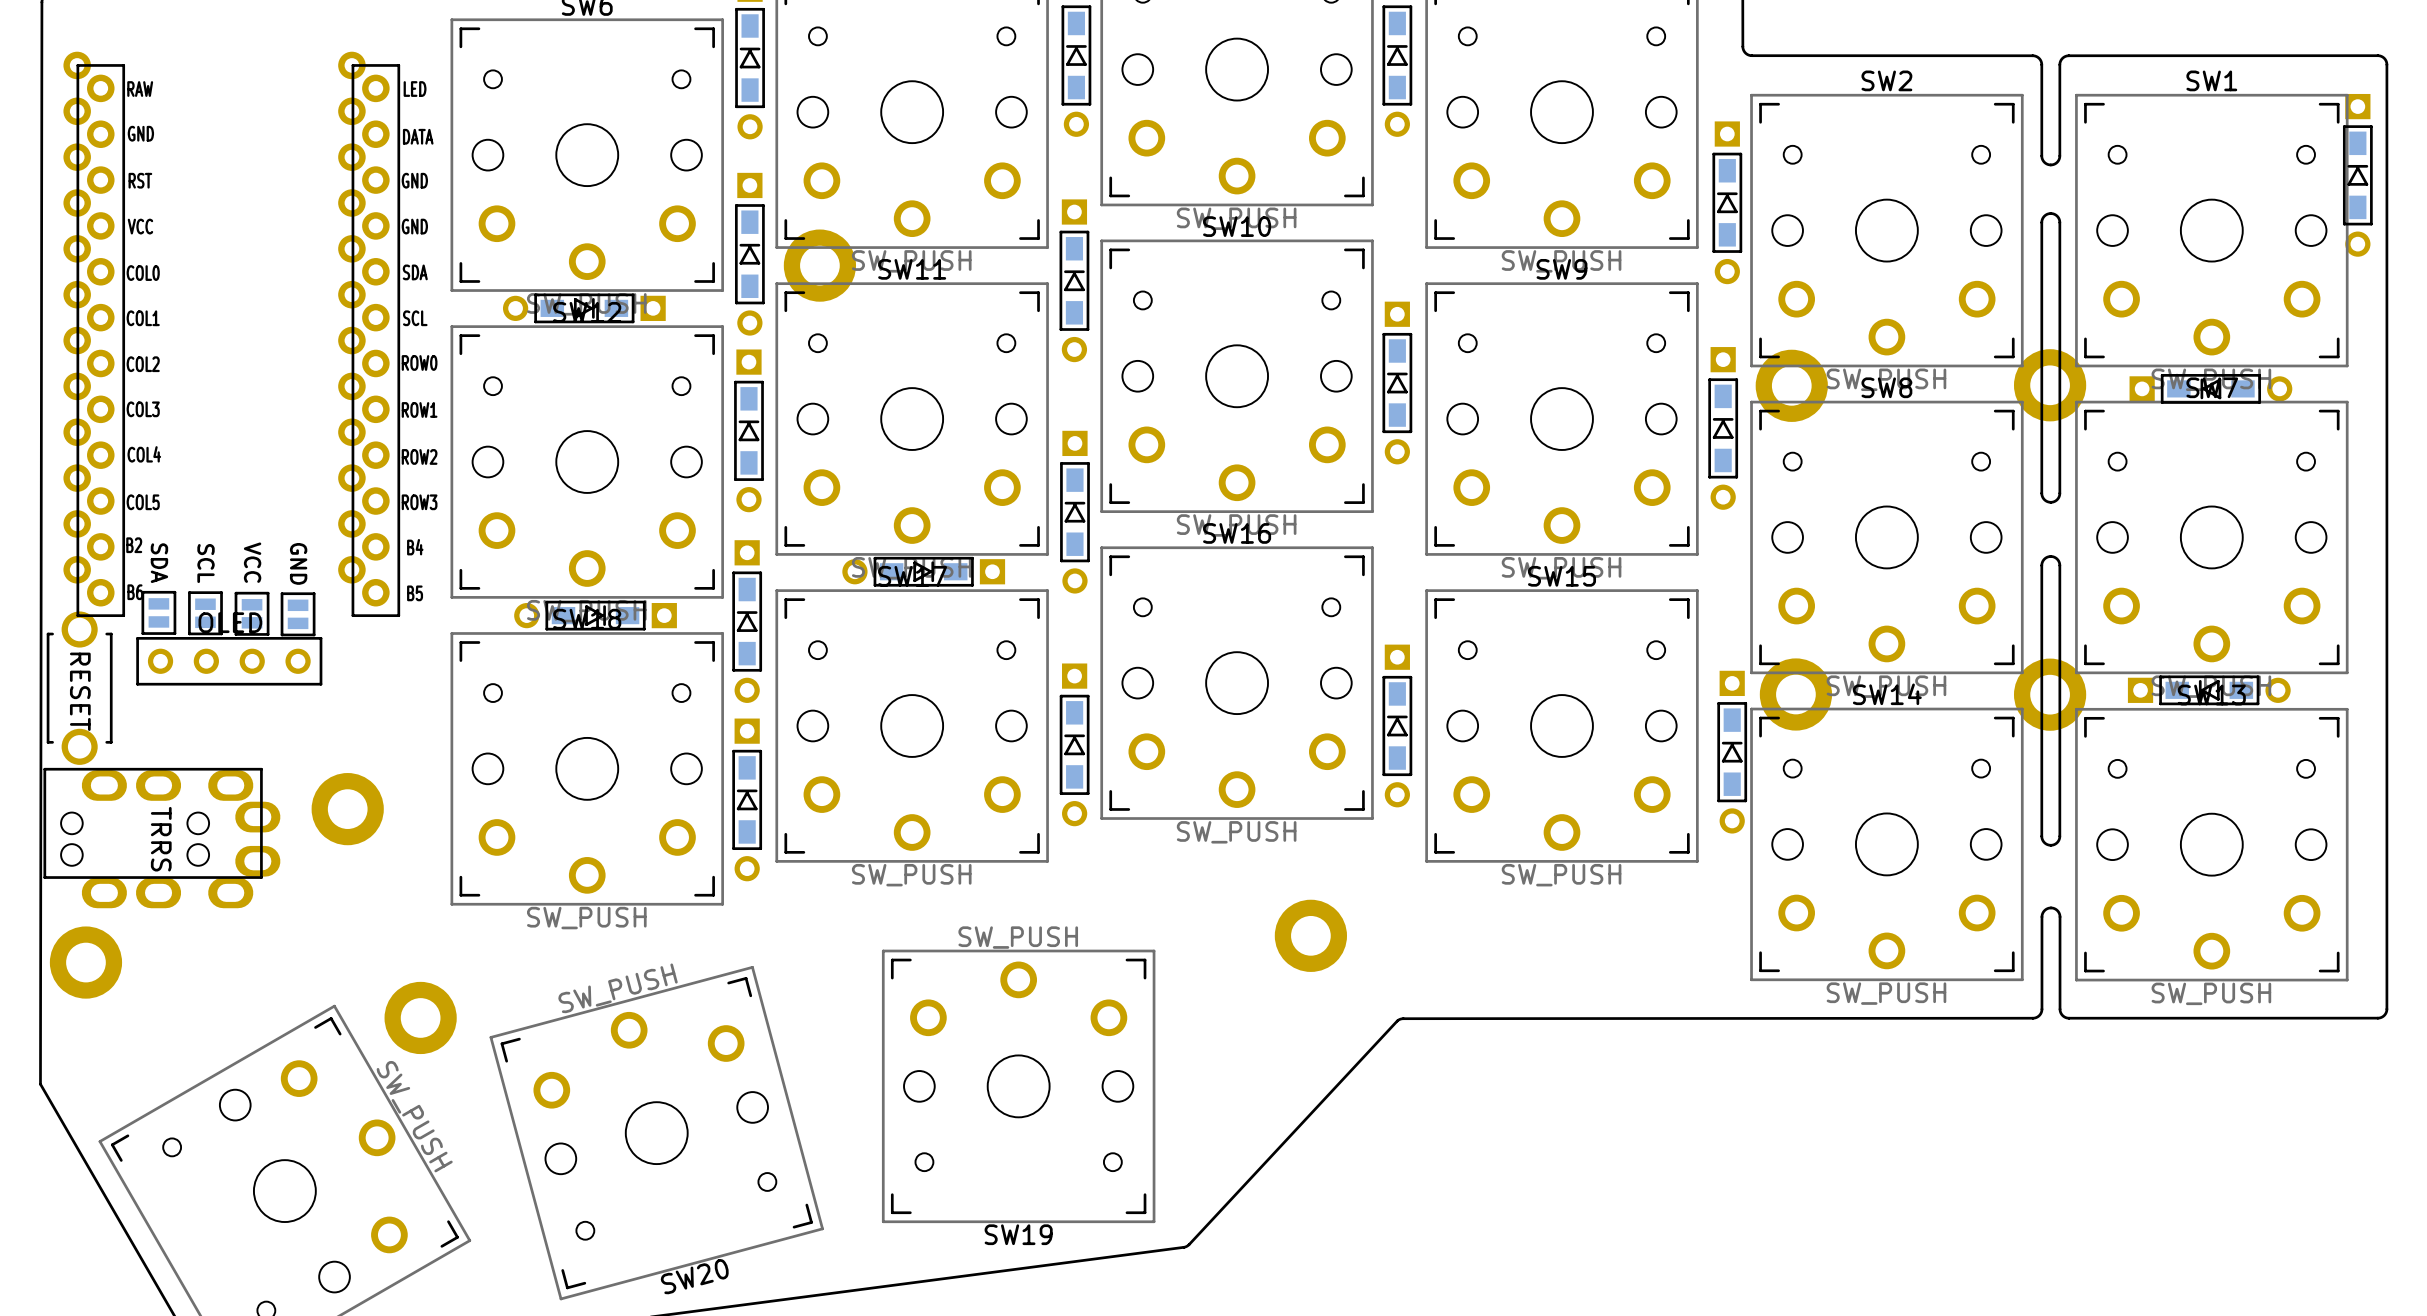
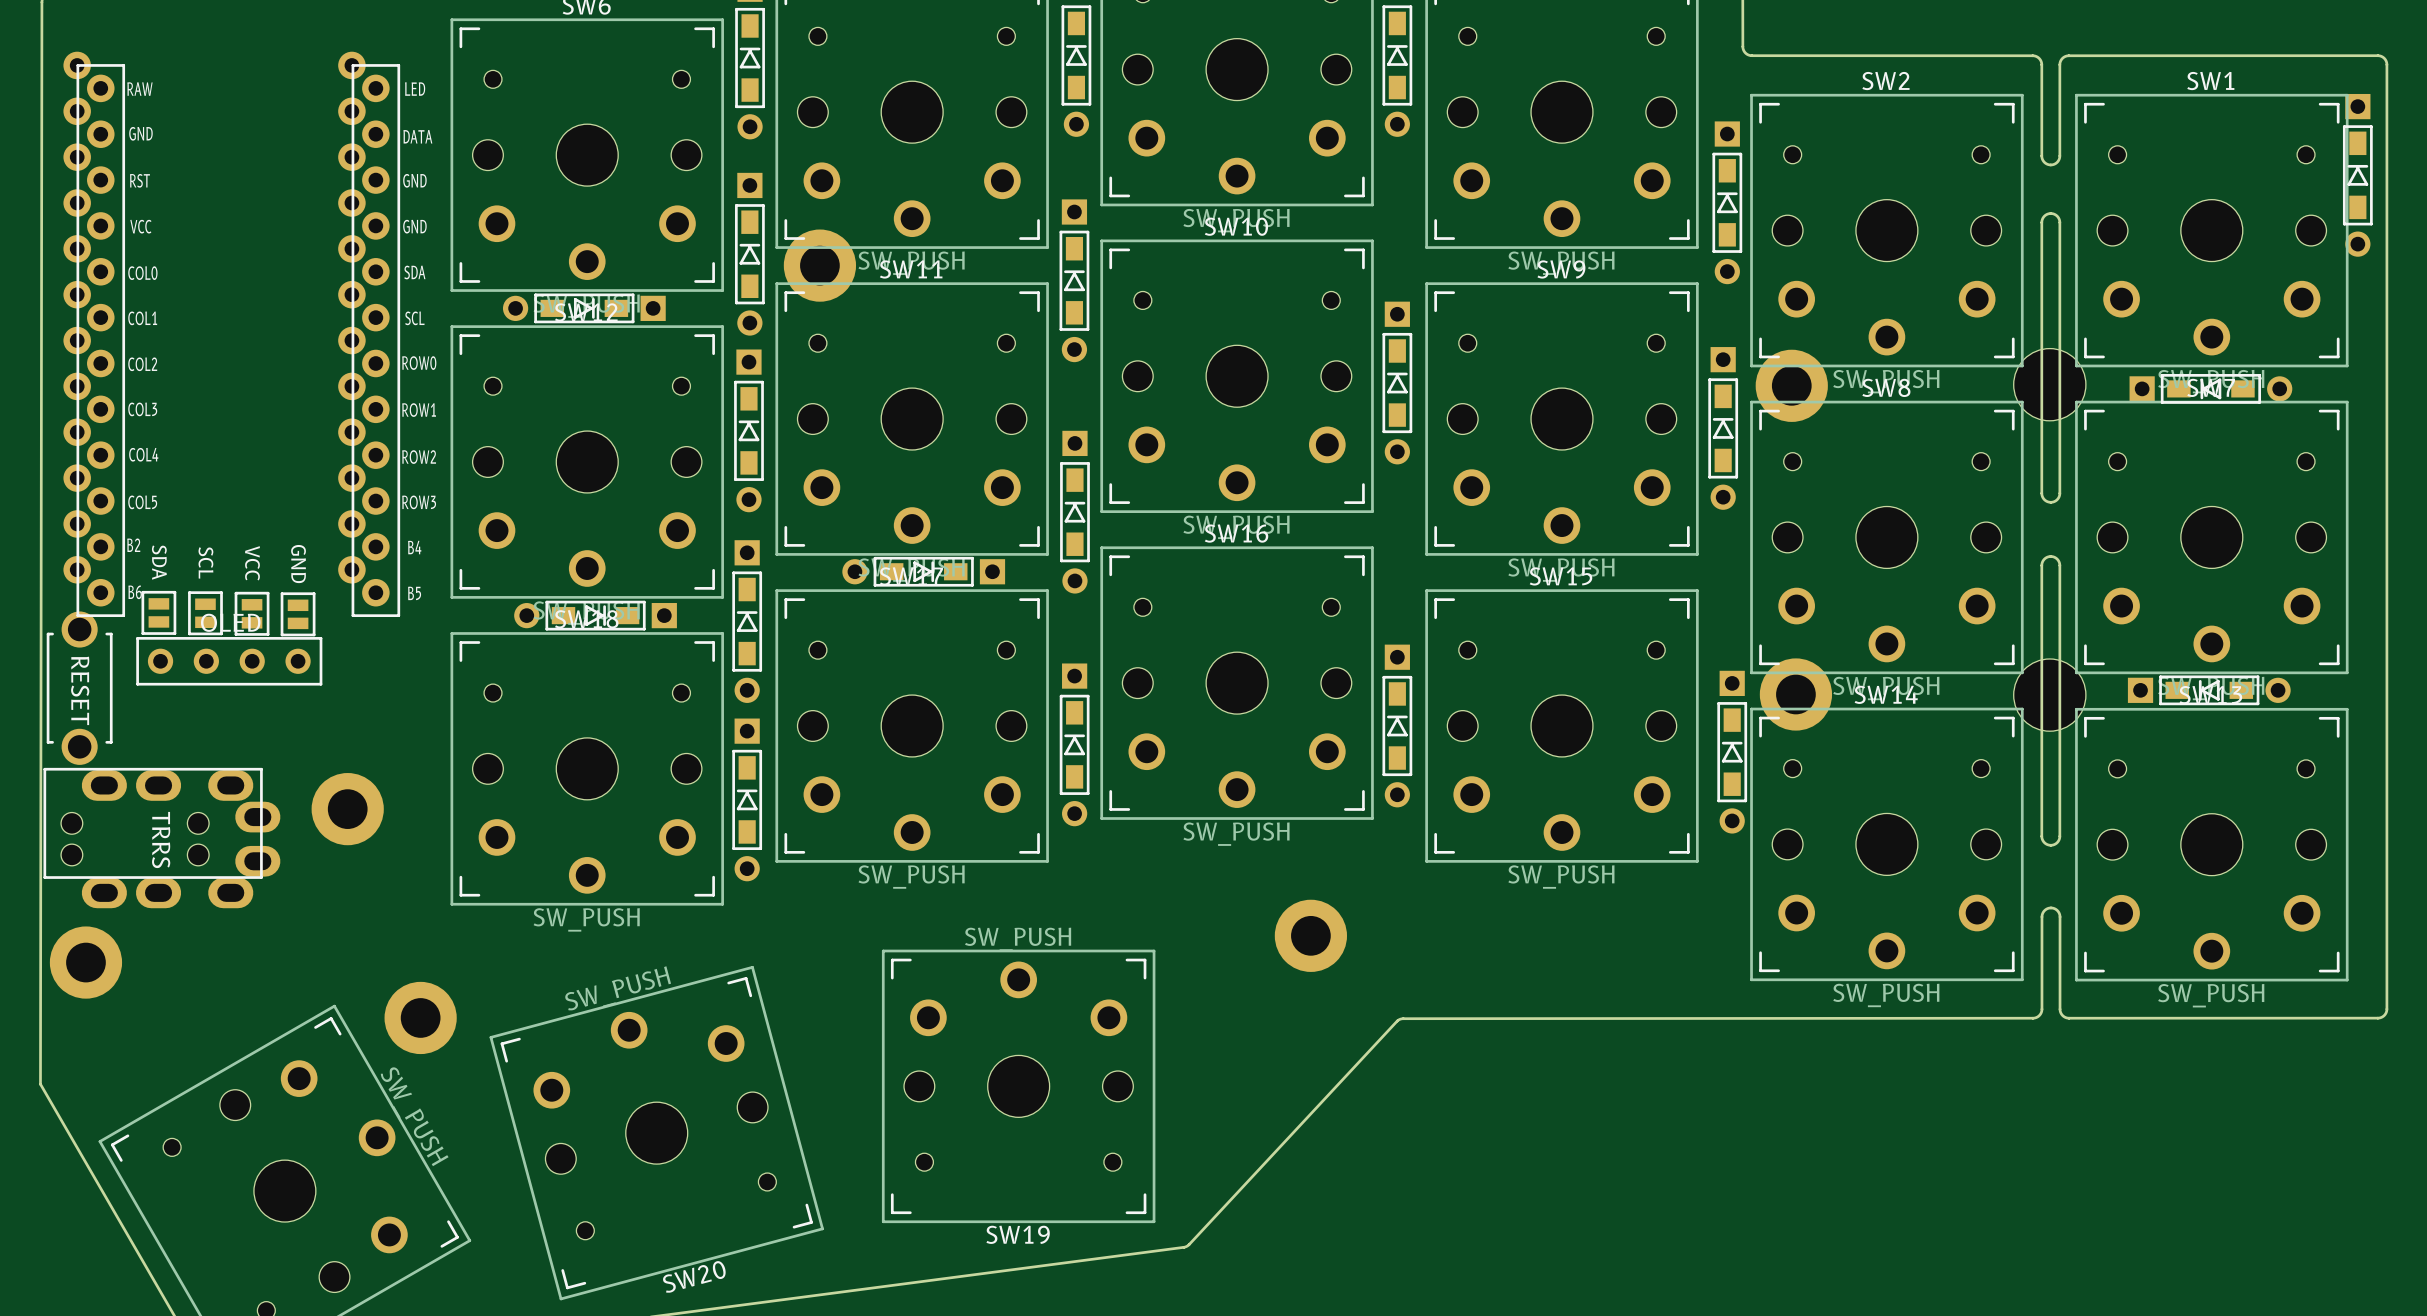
part footprint: [2013, 349, 2087, 422] -> [2013, 348, 2086, 421]
part footprint: [2013, 658, 2087, 731] -> [2013, 658, 2086, 732]

